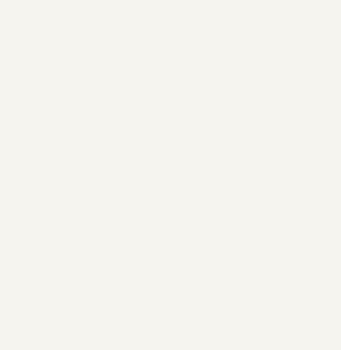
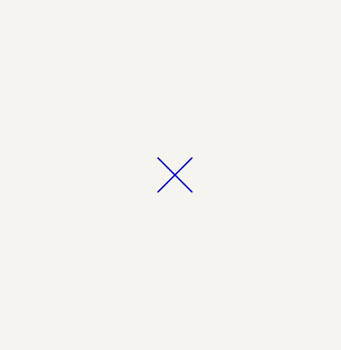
no-connect mark: none -> (174, 174)

